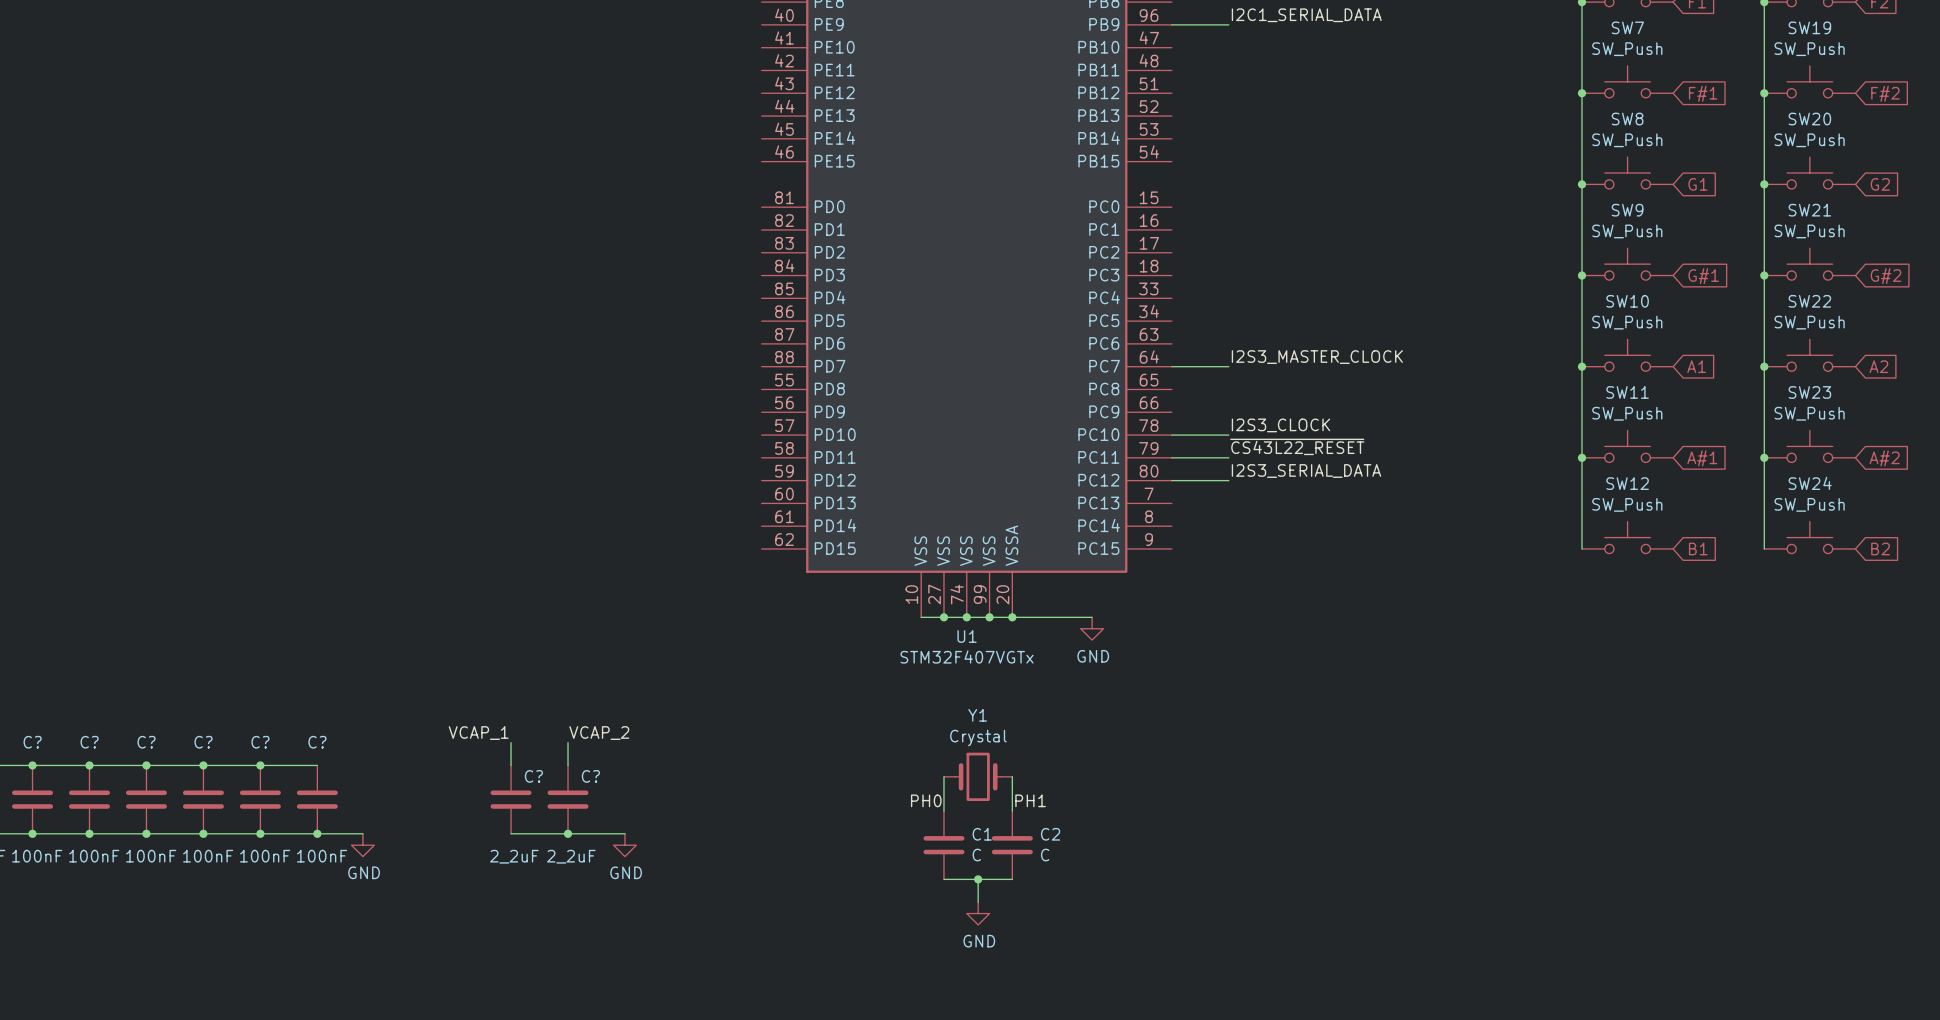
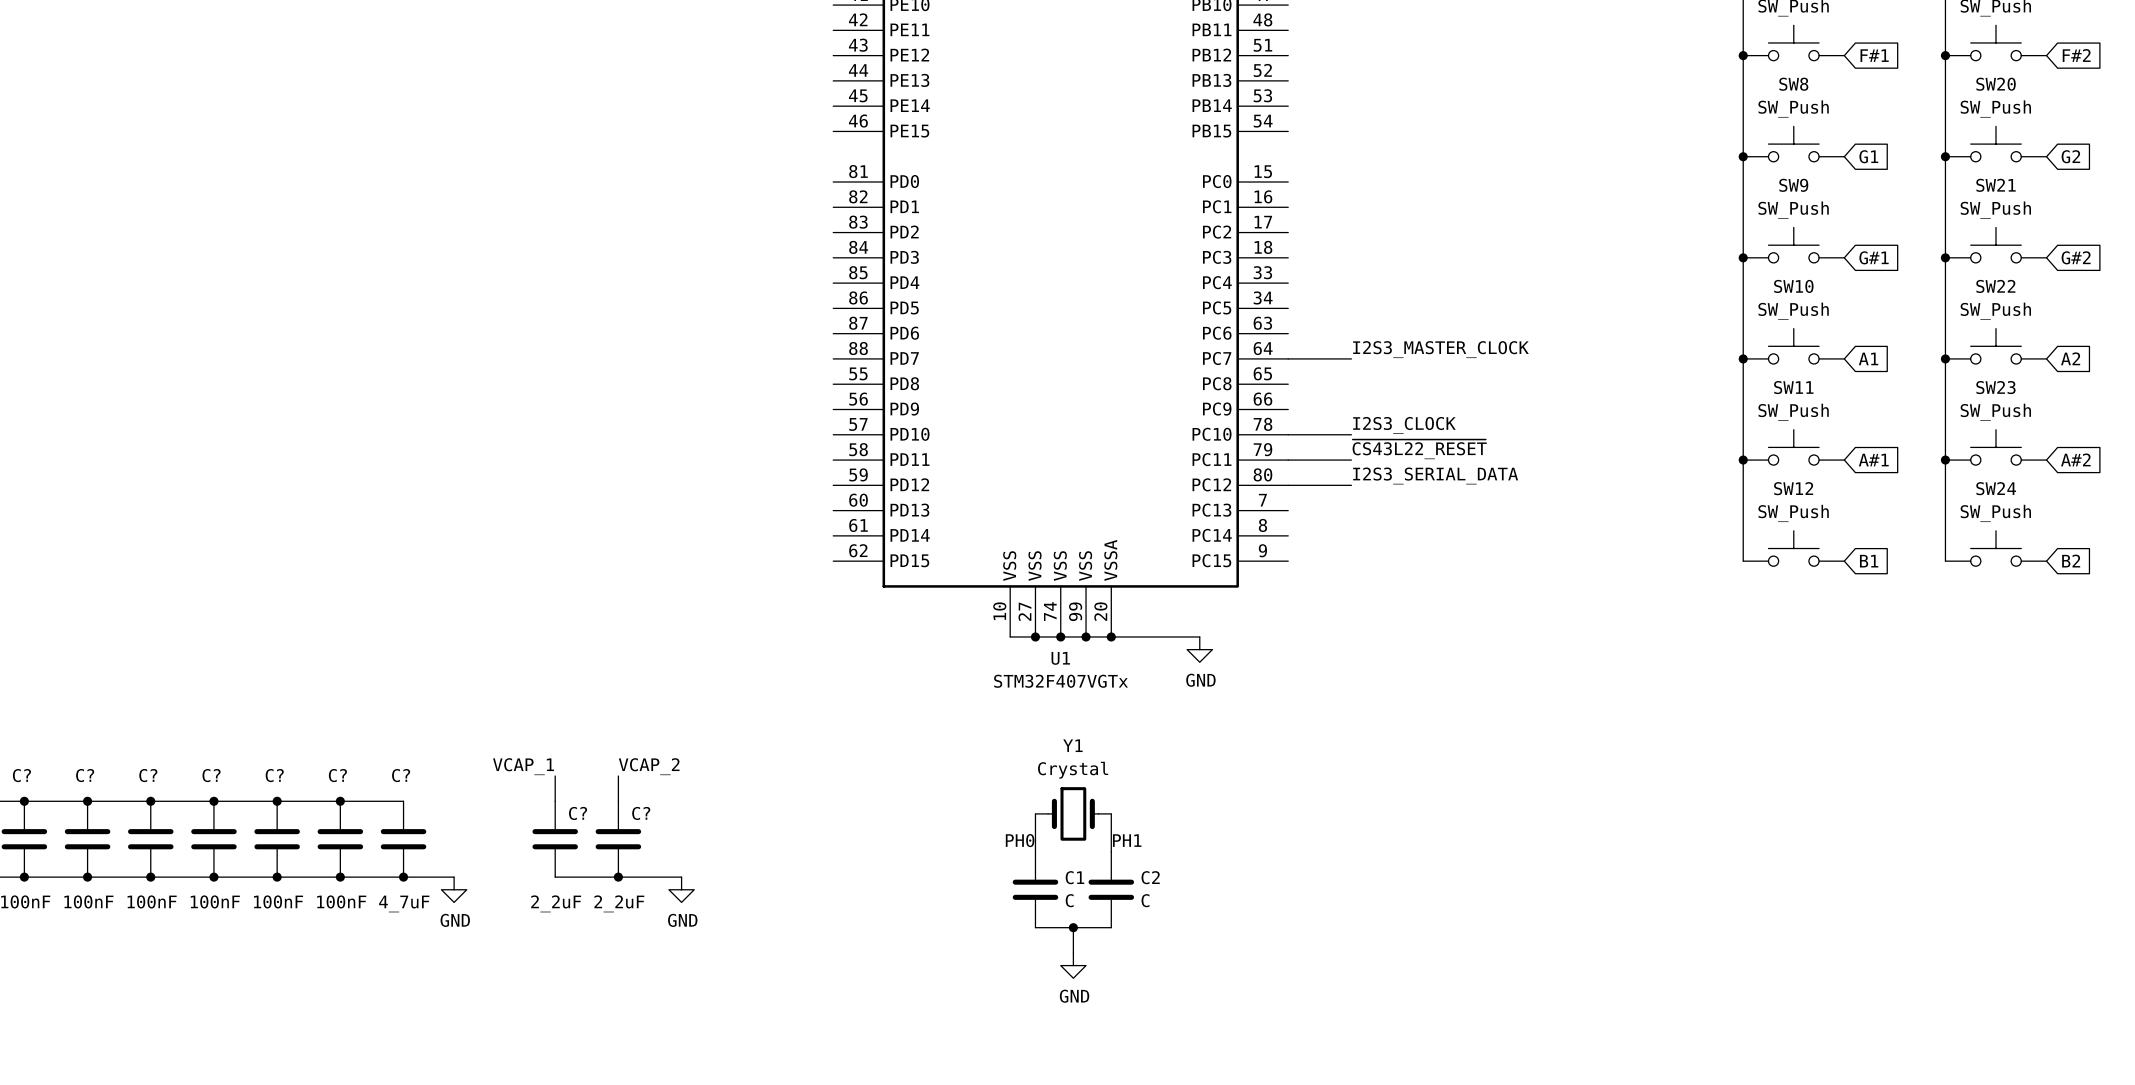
wire: none -> (340, 801) (403, 801)
junction: none -> (340, 801)
C?: none -> 4_7uF (403, 839)
wire: none -> (390, 877) (454, 877)
junction: none -> (403, 877)
power symbol position: GND (362, 845) -> GND (454, 889)

